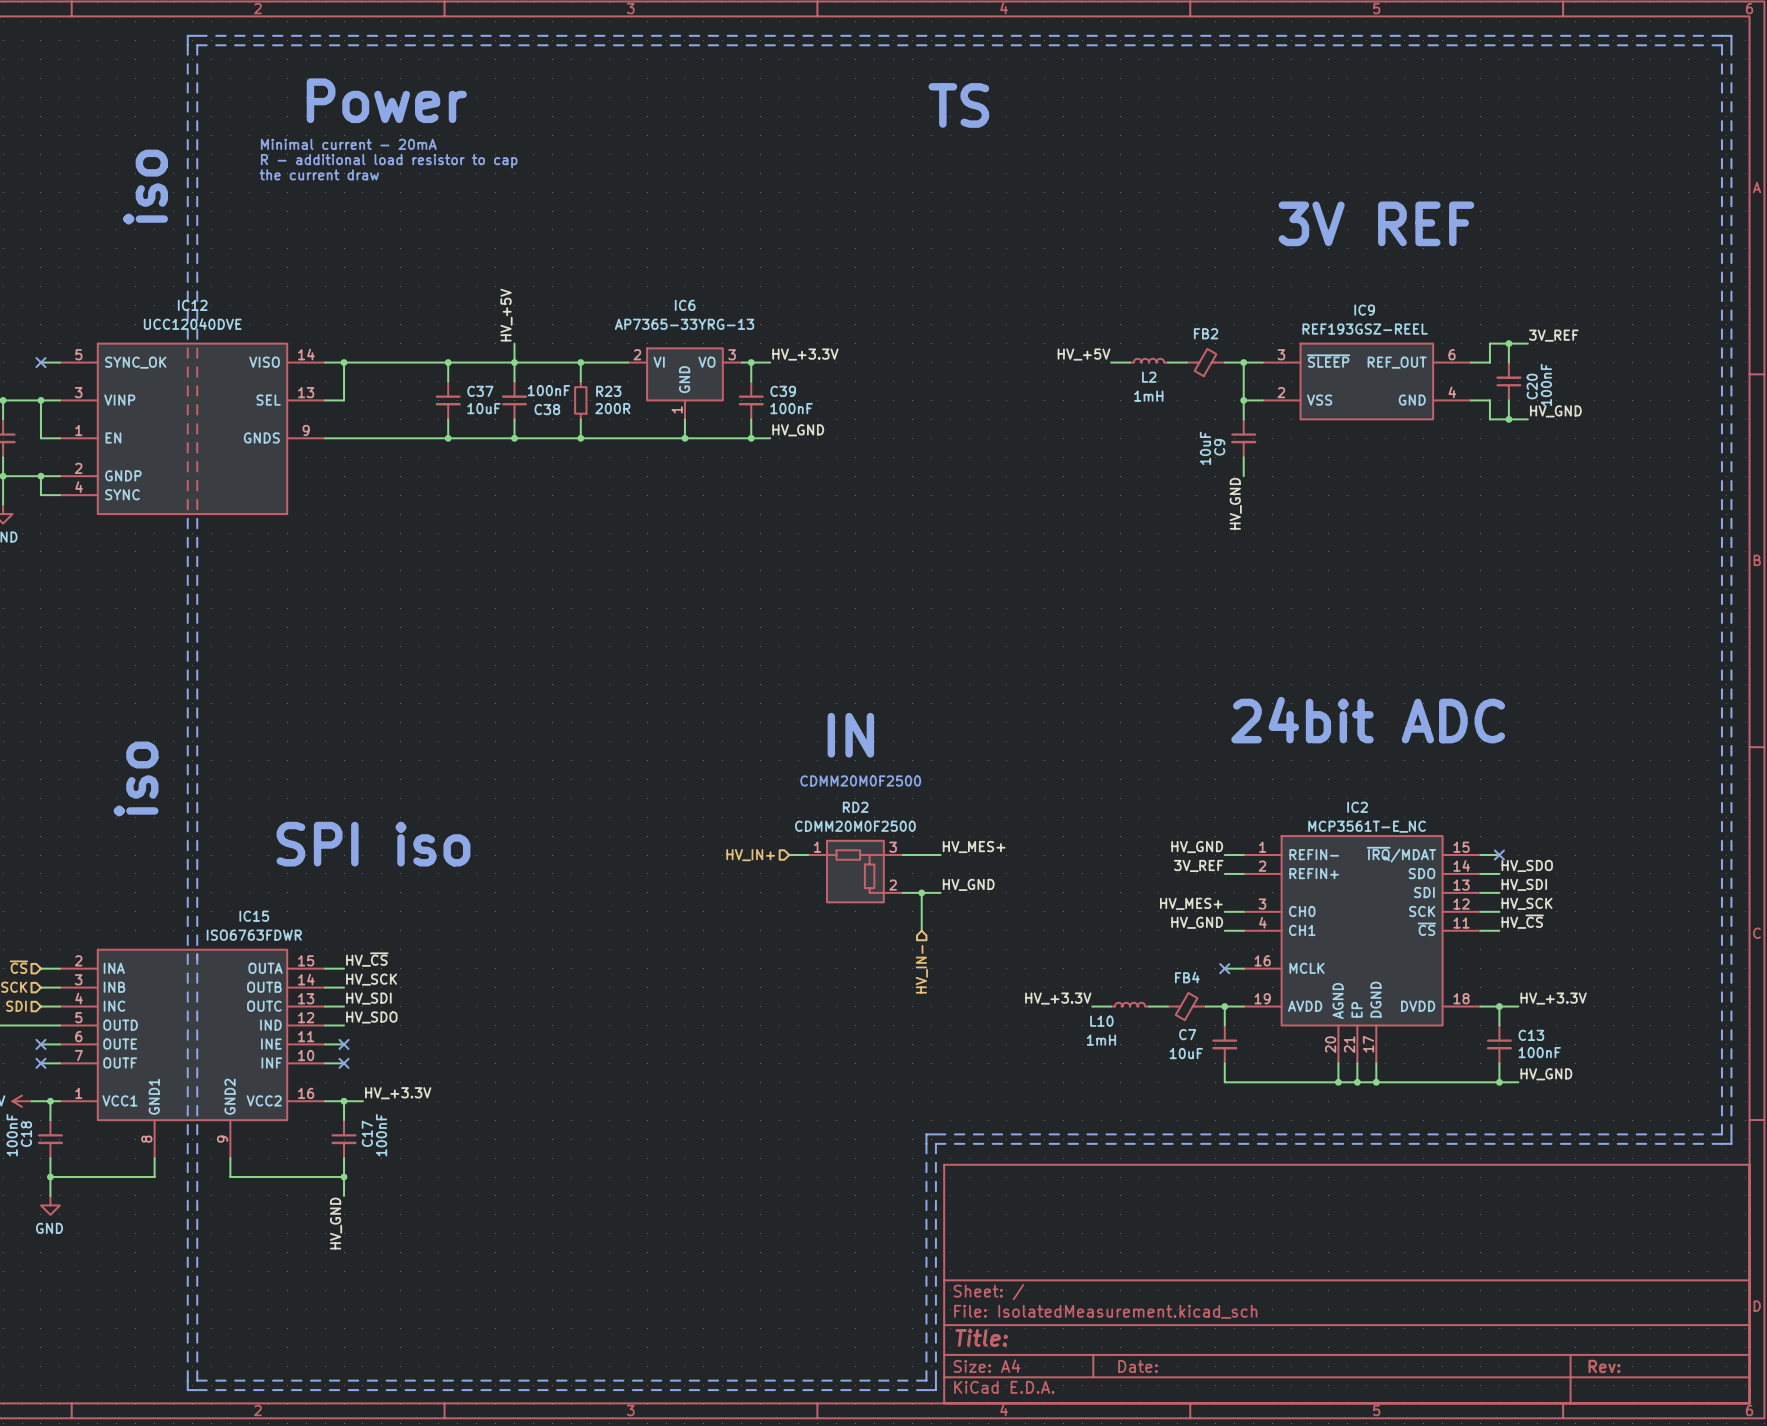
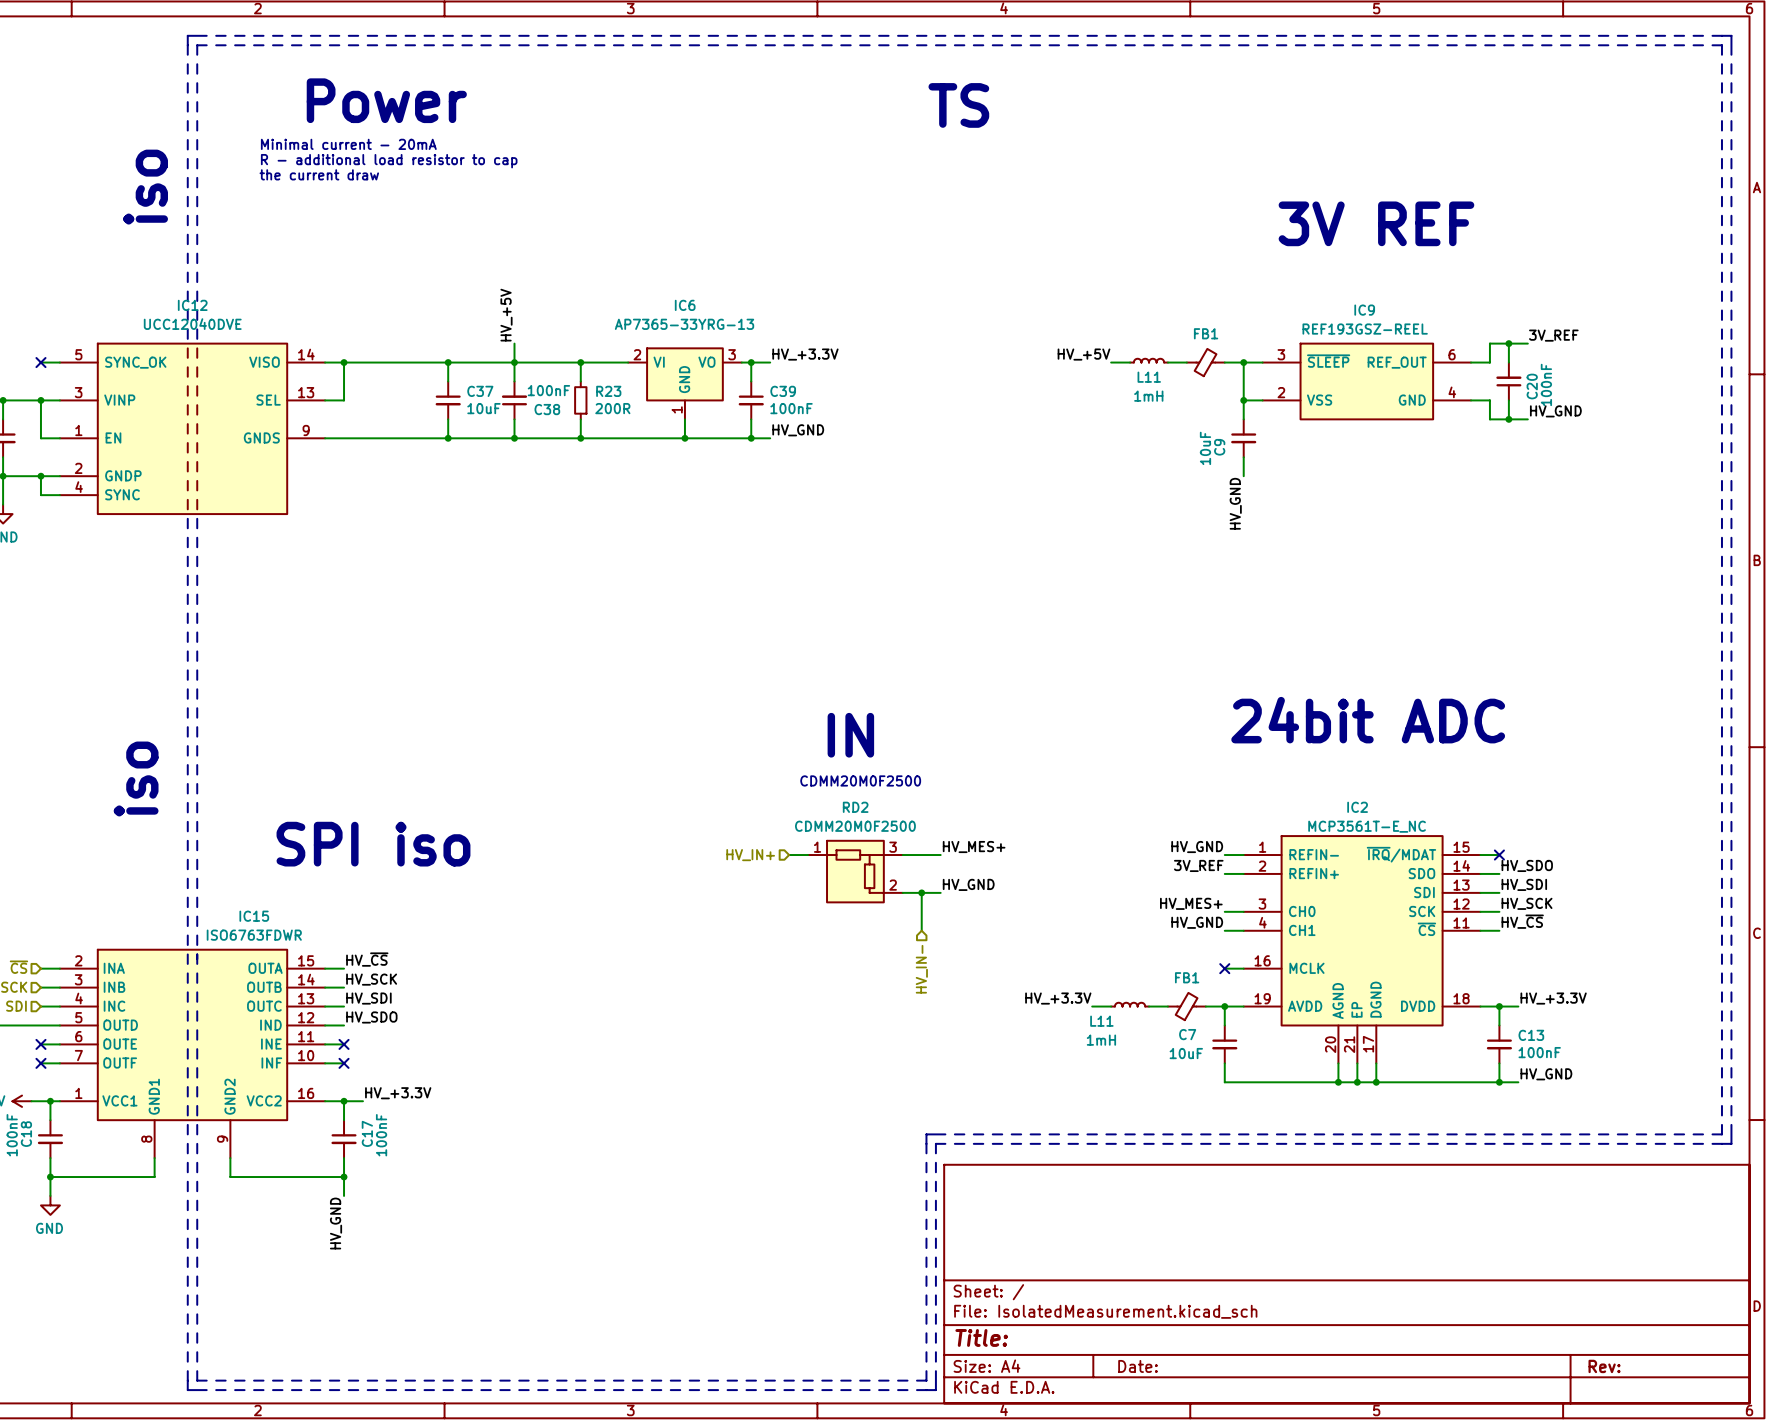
FB2 name: FB2 (1206, 333) -> FB1 (1206, 333)
L2 name: L2 (1149, 377) -> L11 (1149, 377)
FB4 name: FB4 (1187, 977) -> FB1 (1187, 977)
L10 name: L10 (1101, 1021) -> L11 (1101, 1021)

